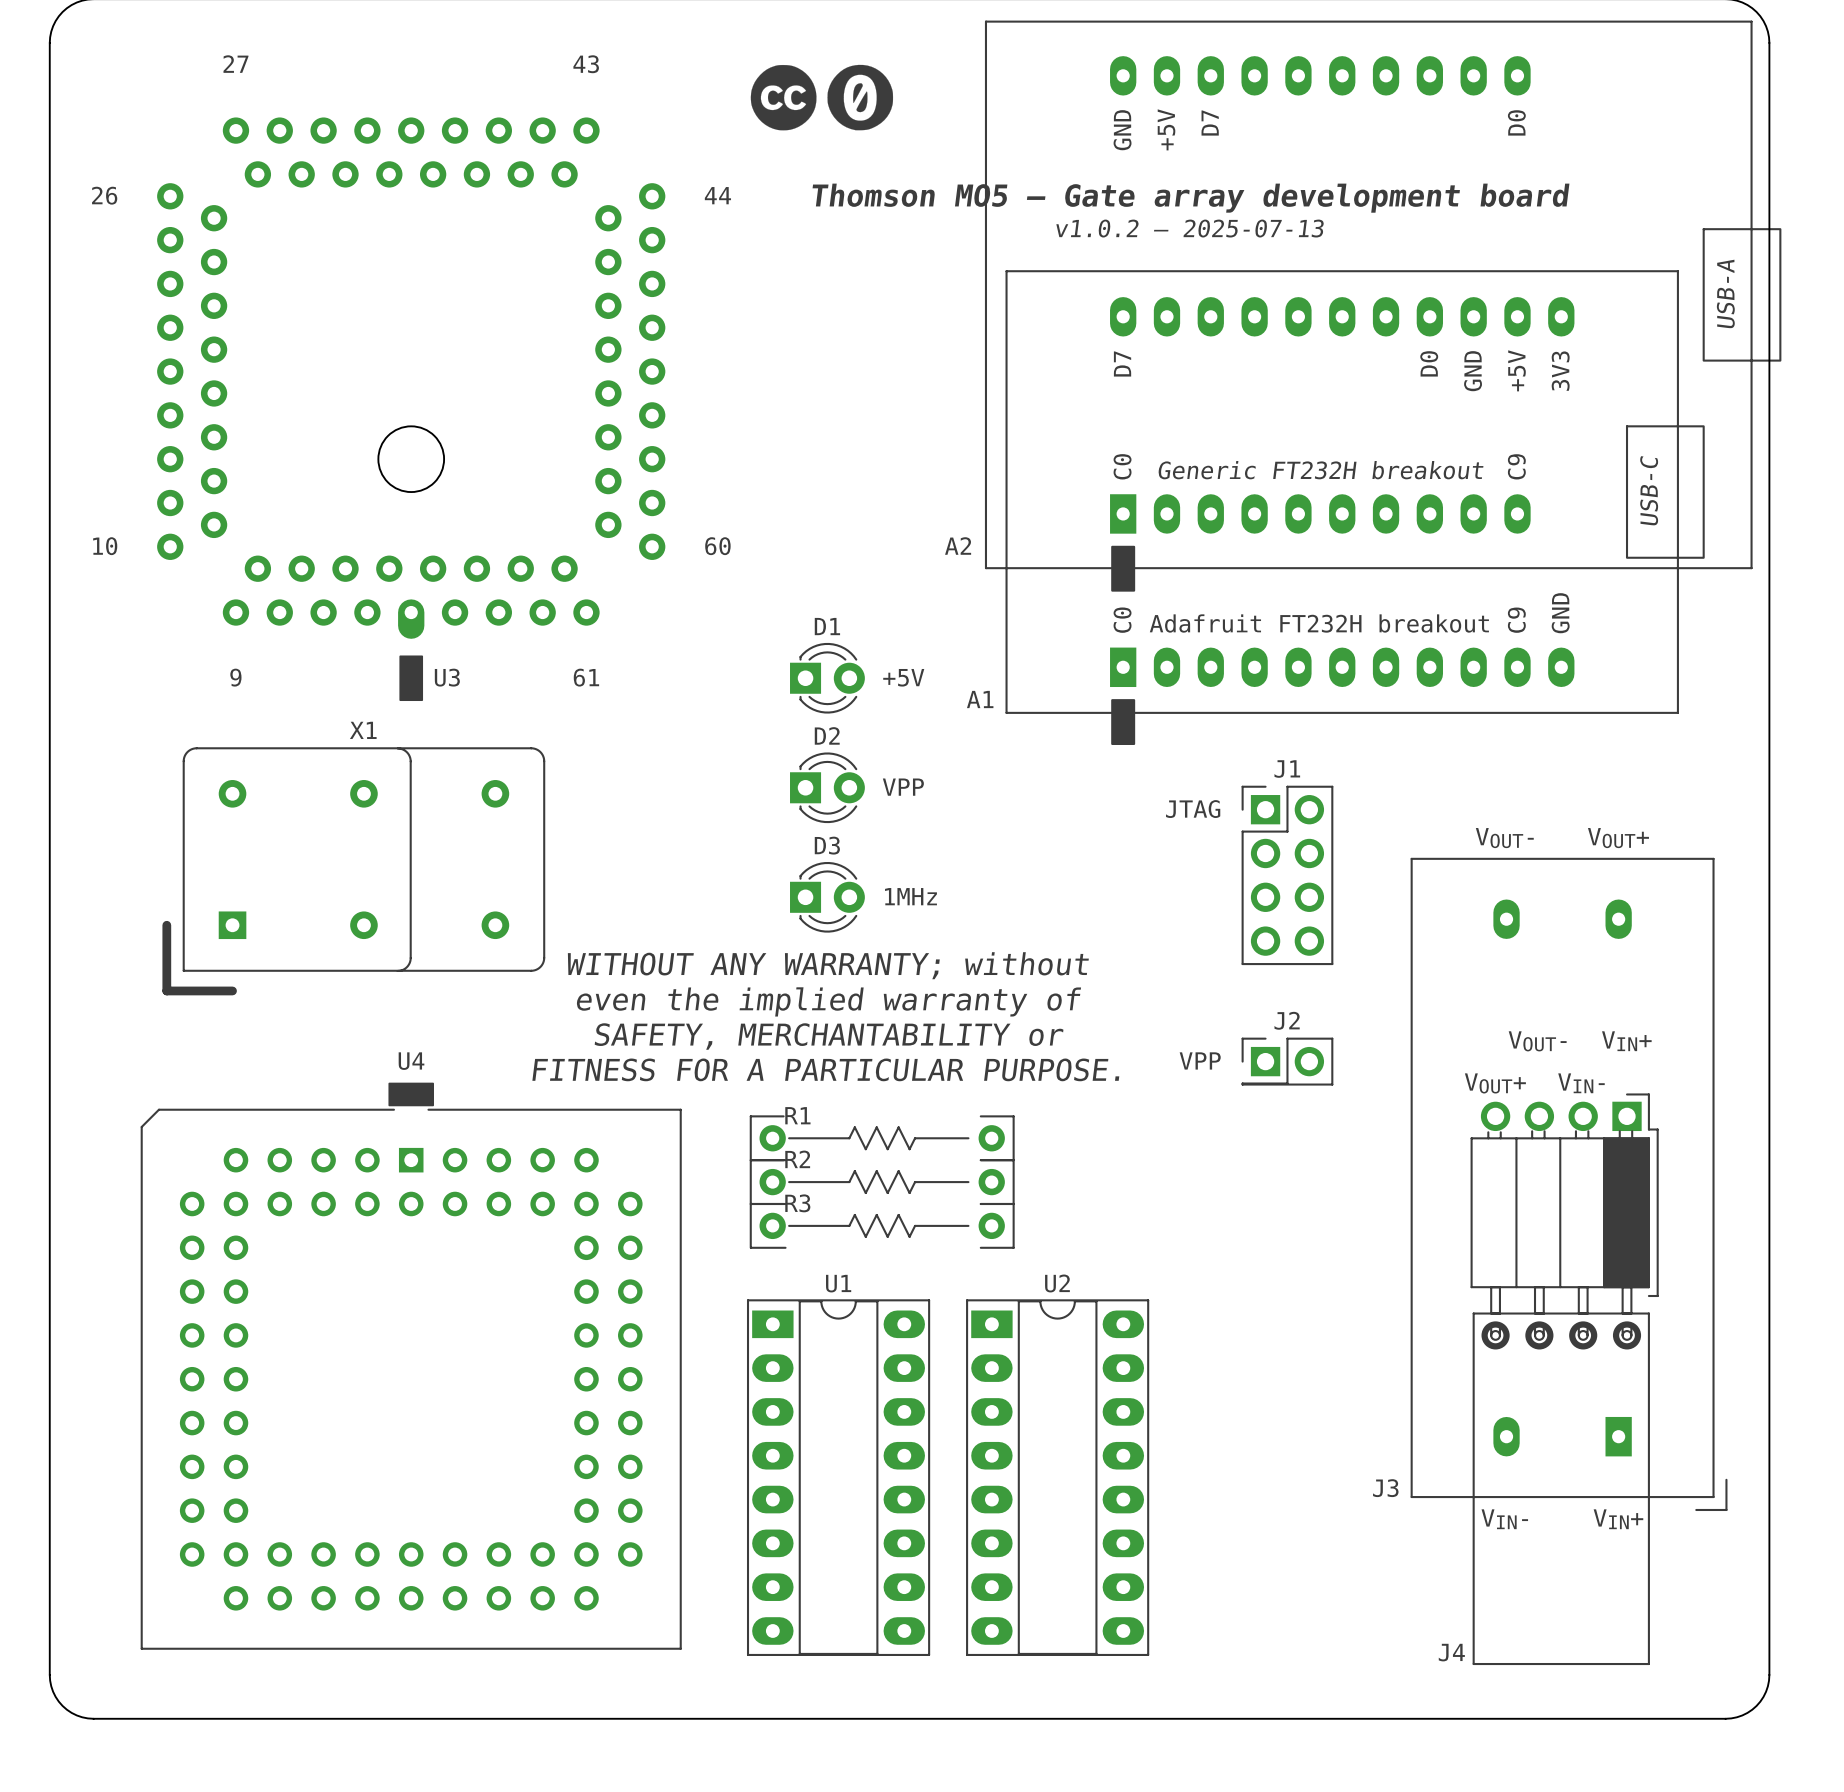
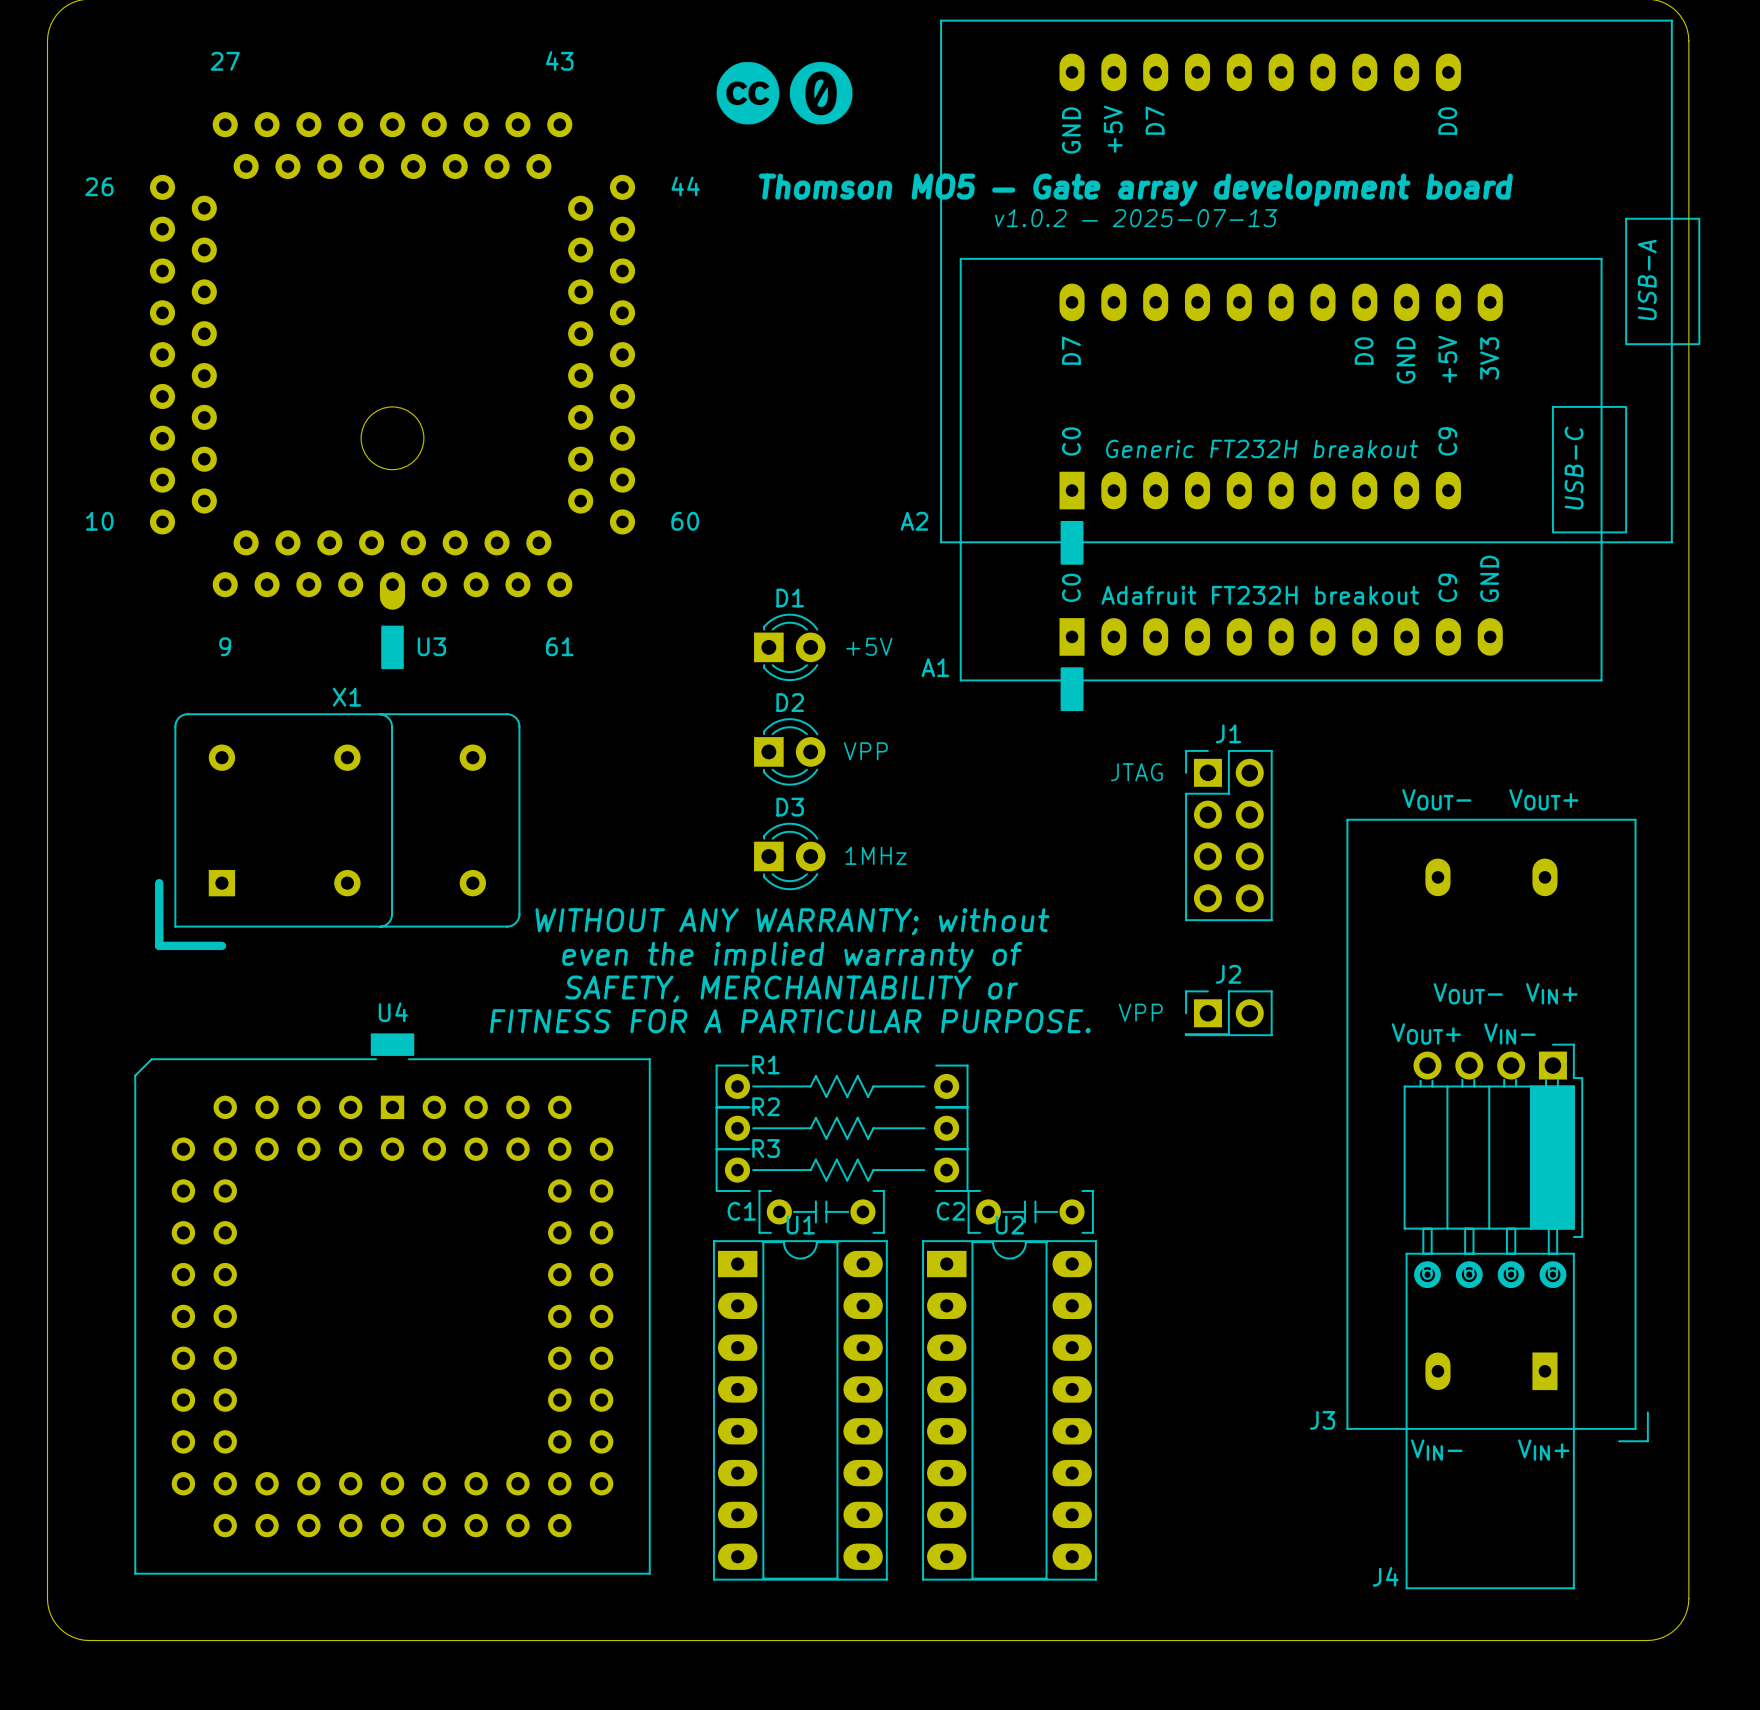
C1: none -> (821, 1211)
C2: none -> (1030, 1211)

